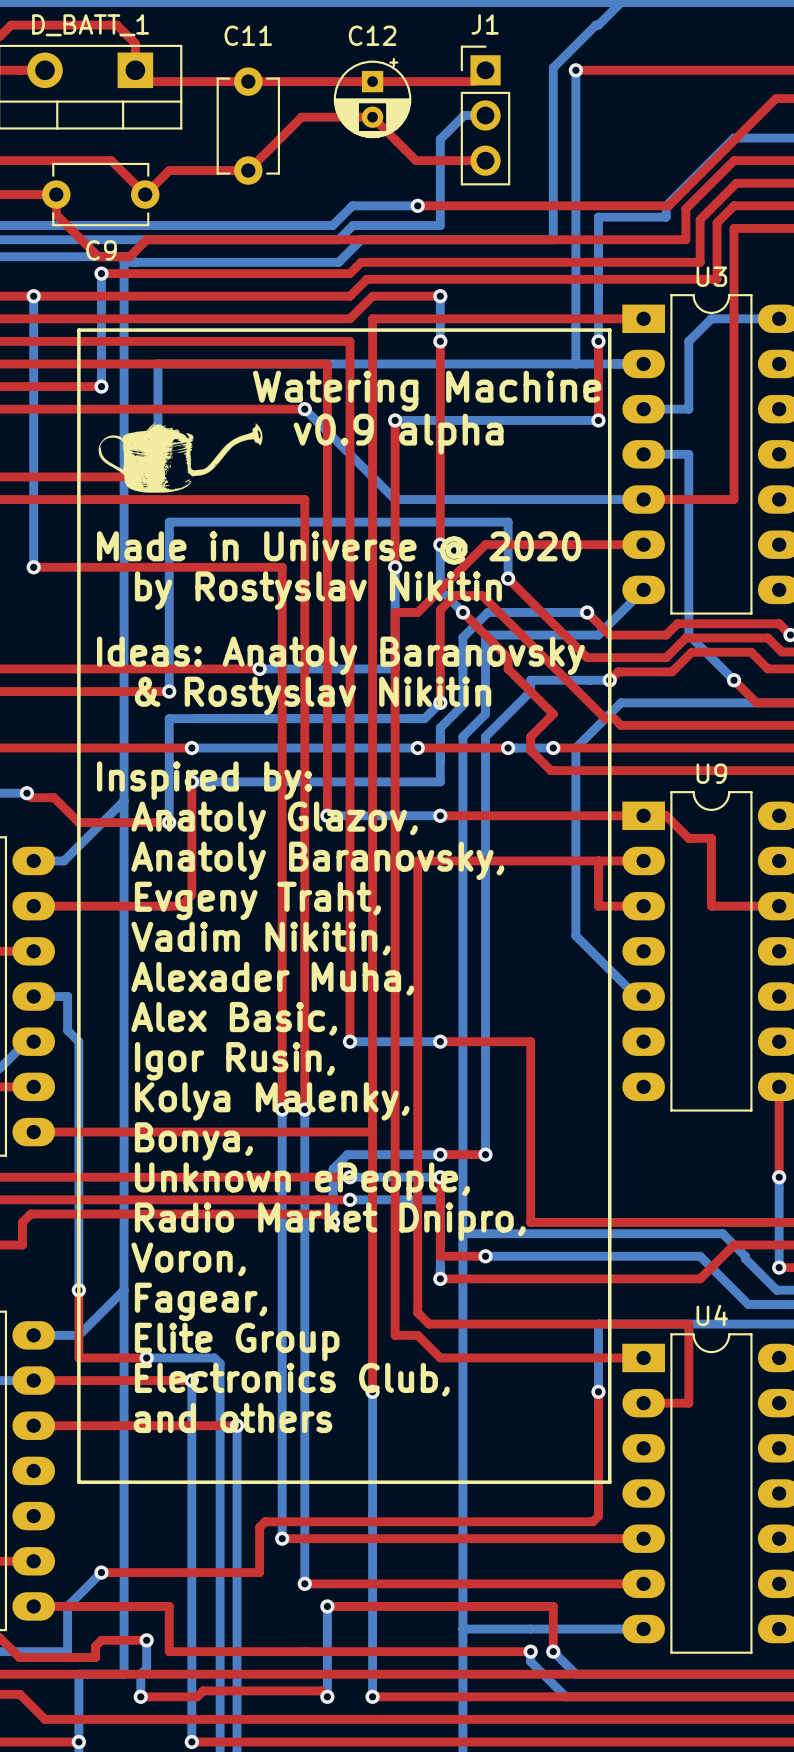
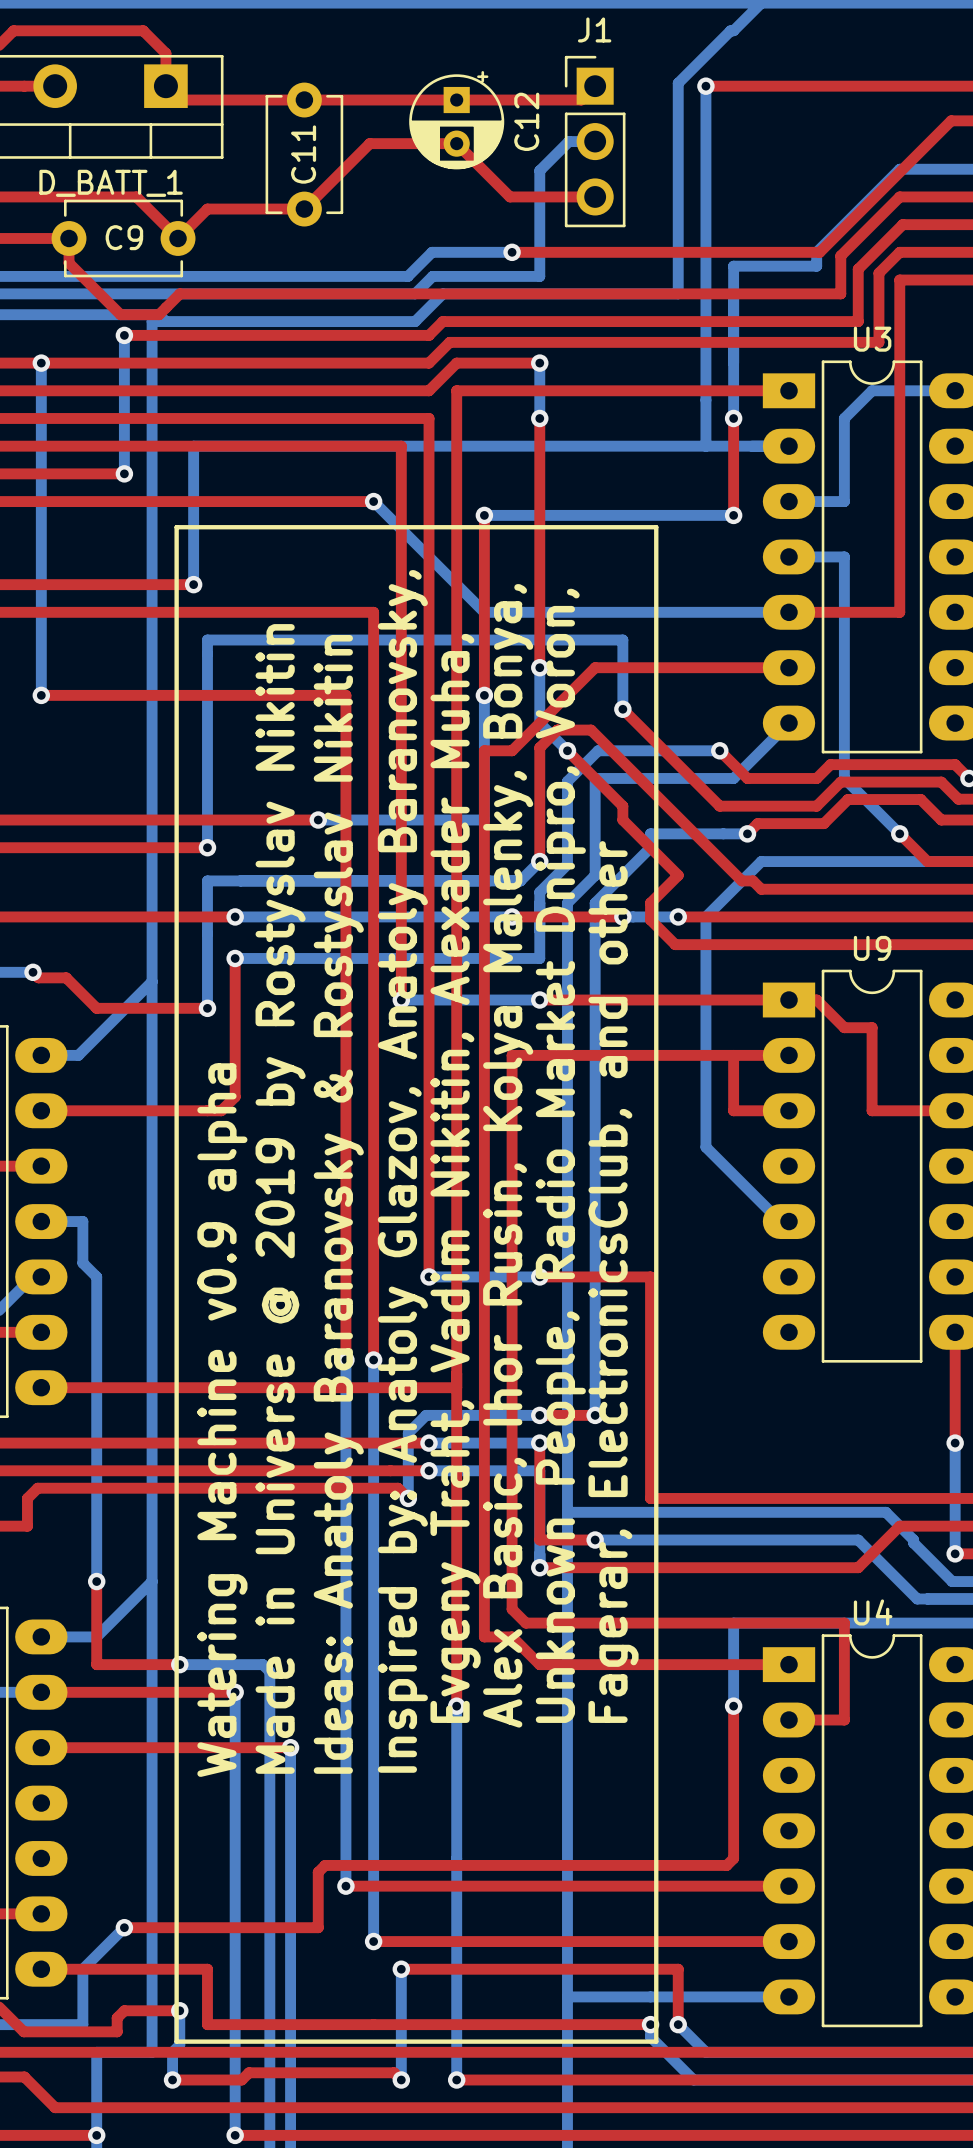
D_BATT_1 name position: D_BATT_1 (90, 25) -> D_BATT_1 (111, 183)
C11 name rotation: 0° (248, 35) -> 90° counterclockwise (303, 154)
C11 name position: C11 (248, 35) -> C11 (303, 154)
C12 name rotation: 0° (372, 35) -> 90° counterclockwise (526, 121)
C12 name position: C12 (372, 35) -> C12 (526, 121)
C9 name position: C9 (101, 250) -> C9 (124, 237)
line: (78, 330) (609, 330) (609, 1482) (78, 1482) (78, 330) -> (176, 527) (176, 2041) (656, 2041) (656, 527) (176, 527)
text: Watering Machine (427, 391) -> none
drawing: [98, 423, 263, 493] -> none
text: v0.9 alpha (398, 434) -> none
text: Made in Universe @ 2020 (339, 548) -> none
text: by Rostyslav Nikitin (318, 590) -> none
text: Ideas: Anatoly Baranovsky (340, 655) -> none
text: & Rostyslav Nikitin (313, 695) -> none
text: Inspired by: (204, 780) -> none
text: Anatoly Glazov, (274, 820) -> none
text: Anatoly Baranovsky, (317, 860) -> none
text: Evgeny Traht, (257, 900) -> none
text: Vadim Nikitin, (260, 938) -> none
text: none -> Alex Basic, Ihor Rusin, Kolya Malenky, Bonya, (508, 1155)
text: none -> Inspired by: Anatoly Glazov, Anatoly Baranovsky, (402, 1171)
text: none -> Evgeny Traht, Vadim Nikitin, Alexader Muha, (455, 1178)
text: none -> Made in Universe @ 2019 by Rostyslav Nikitin (280, 1198)
text: Alexader Muha, (272, 978) -> none
text: none -> Ideas: Anatoly Baranovsky & Rostyslav Nikitin (338, 1204)
text: Alex Basic, (234, 1018) -> none
text: Igor Rusin, (234, 1061) -> none
text: Kolya Malenky, (272, 1101) -> none
text: Bonya, (193, 1141) -> none
text: none -> Watering Machine v0.9 alpha (222, 1420)
text: Unknown ePeople, (302, 1181) -> none
text: Radio Market Dnipro, (330, 1221) -> Unknown People, Radio Market Dnipro, Voron, (560, 1155)
text: Voron, (188, 1259) -> none
text: Fagear, (201, 1301) -> none
text: Elite Group (237, 1341) -> none
text: Electronics Club, (292, 1379) -> Fagerar, ElectronicsClub, and other (613, 1282)
text: and others (233, 1417) -> none

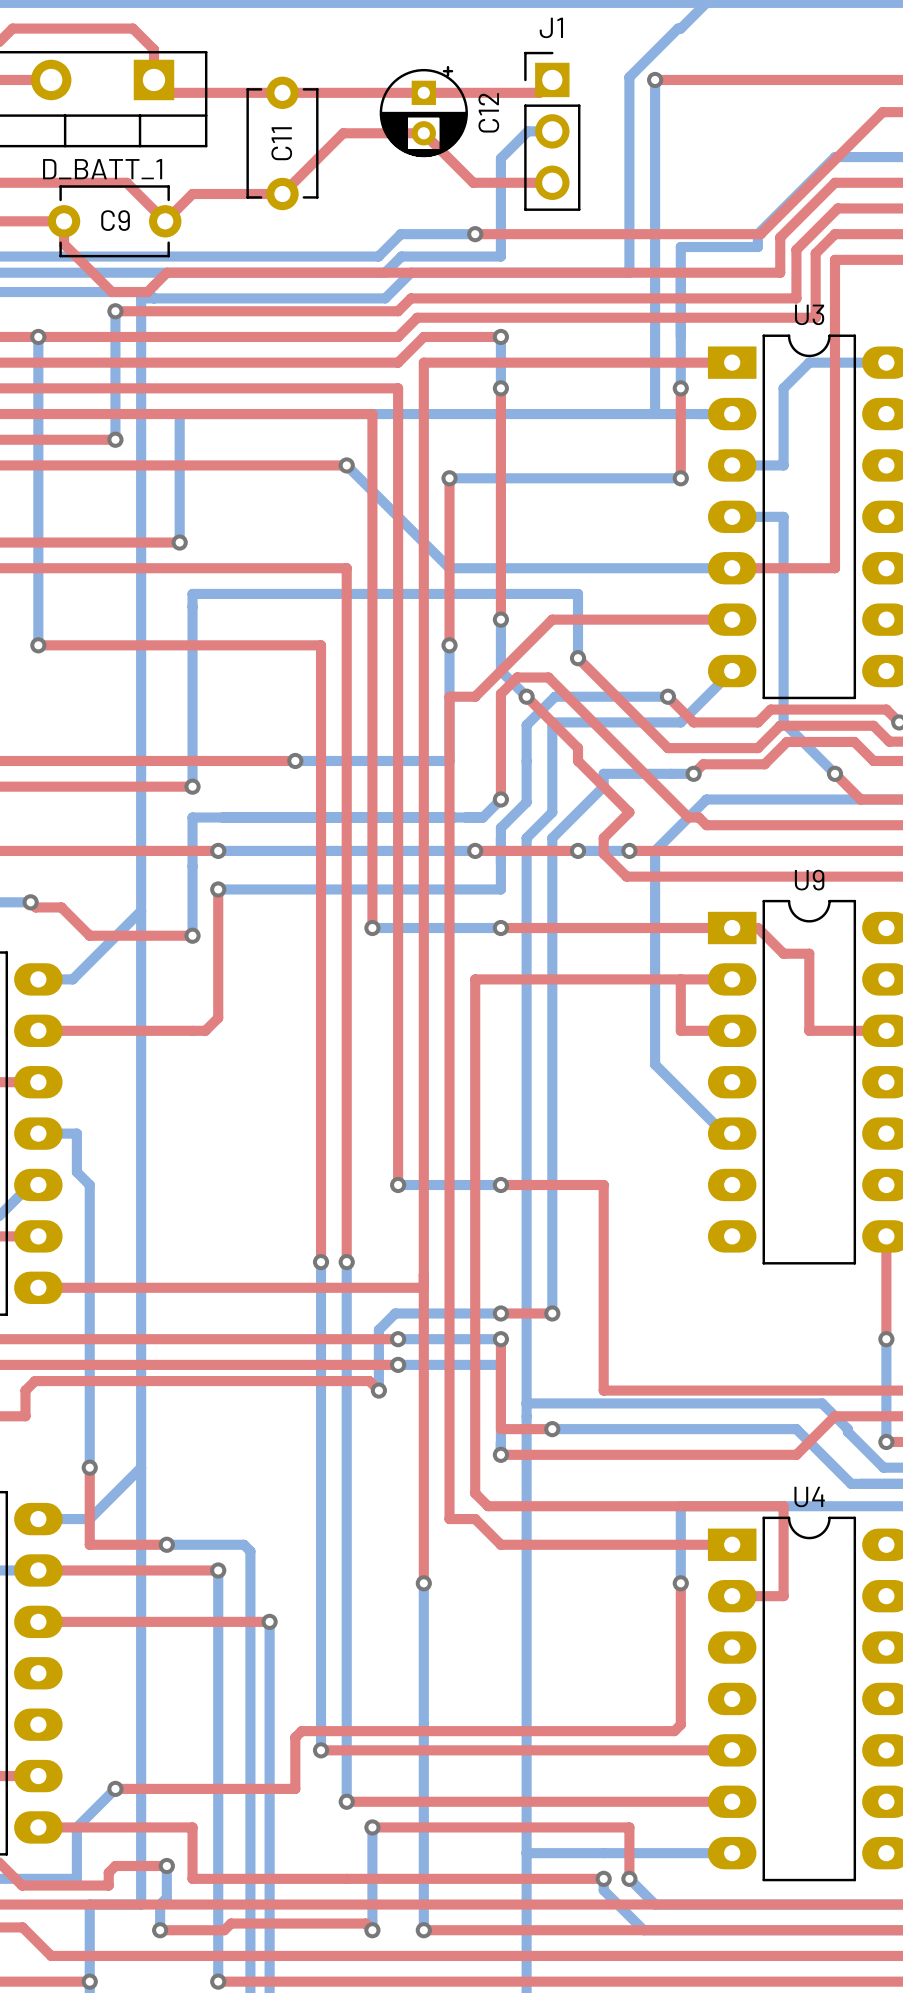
line: (176, 527) (176, 2041) (656, 2041) (656, 527) (176, 527) -> none
text: Alex Basic, Ihor Rusin, Kolya Malenky, Bonya, (508, 1155) -> none
text: Unknown People, Radio Market Dnipro, Voron, (560, 1155) -> none
text: Inspired by: Anatoly Glazov, Anatoly Baranovsky, (402, 1171) -> none
text: Evgeny Traht, Vadim Nikitin, Alexader Muha, (455, 1178) -> none
text: Made in Universe @ 2019 by Rostyslav Nikitin (280, 1198) -> none
text: Ideas: Anatoly Baranovsky & Rostyslav Nikitin (338, 1204) -> none
text: Fagerar, ElectronicsClub, and other (613, 1282) -> none
text: Watering Machine v0.9 alpha (222, 1420) -> none

